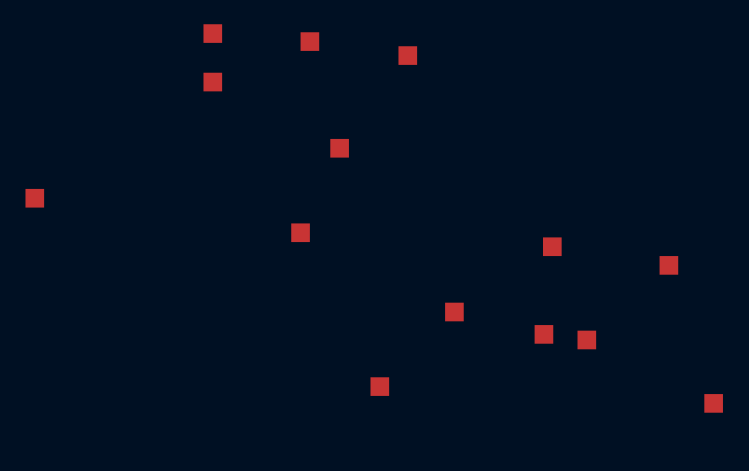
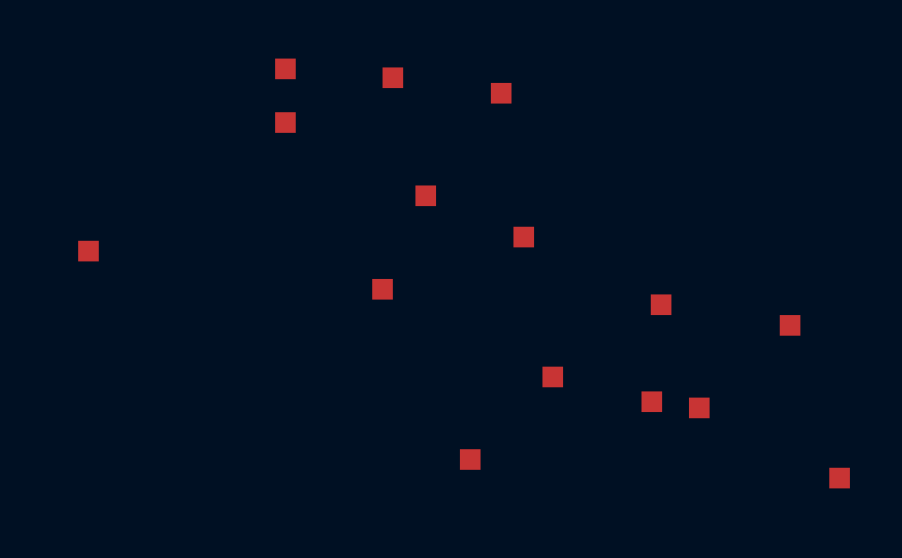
part: none -> (523, 237)

